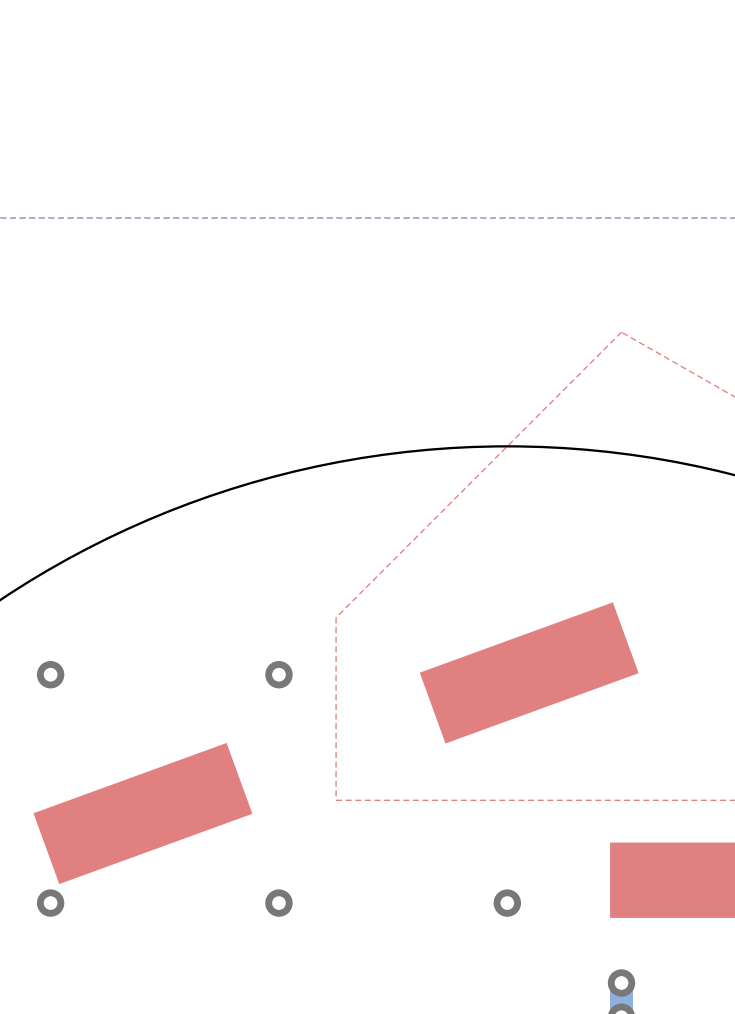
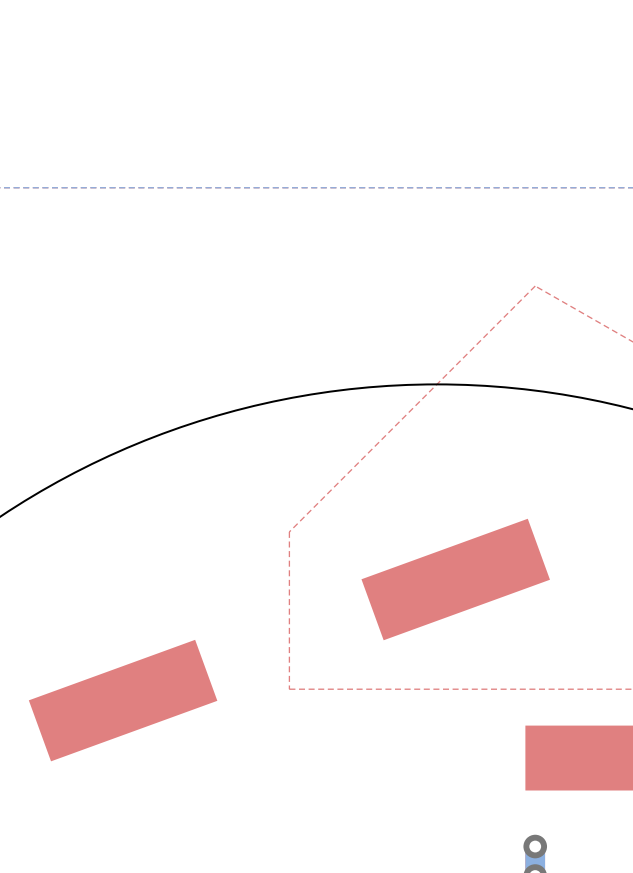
via: (50, 674) -> none
via: (278, 674) -> none
via: (50, 903) -> none
via: (278, 903) -> none
via: (507, 903) -> none

